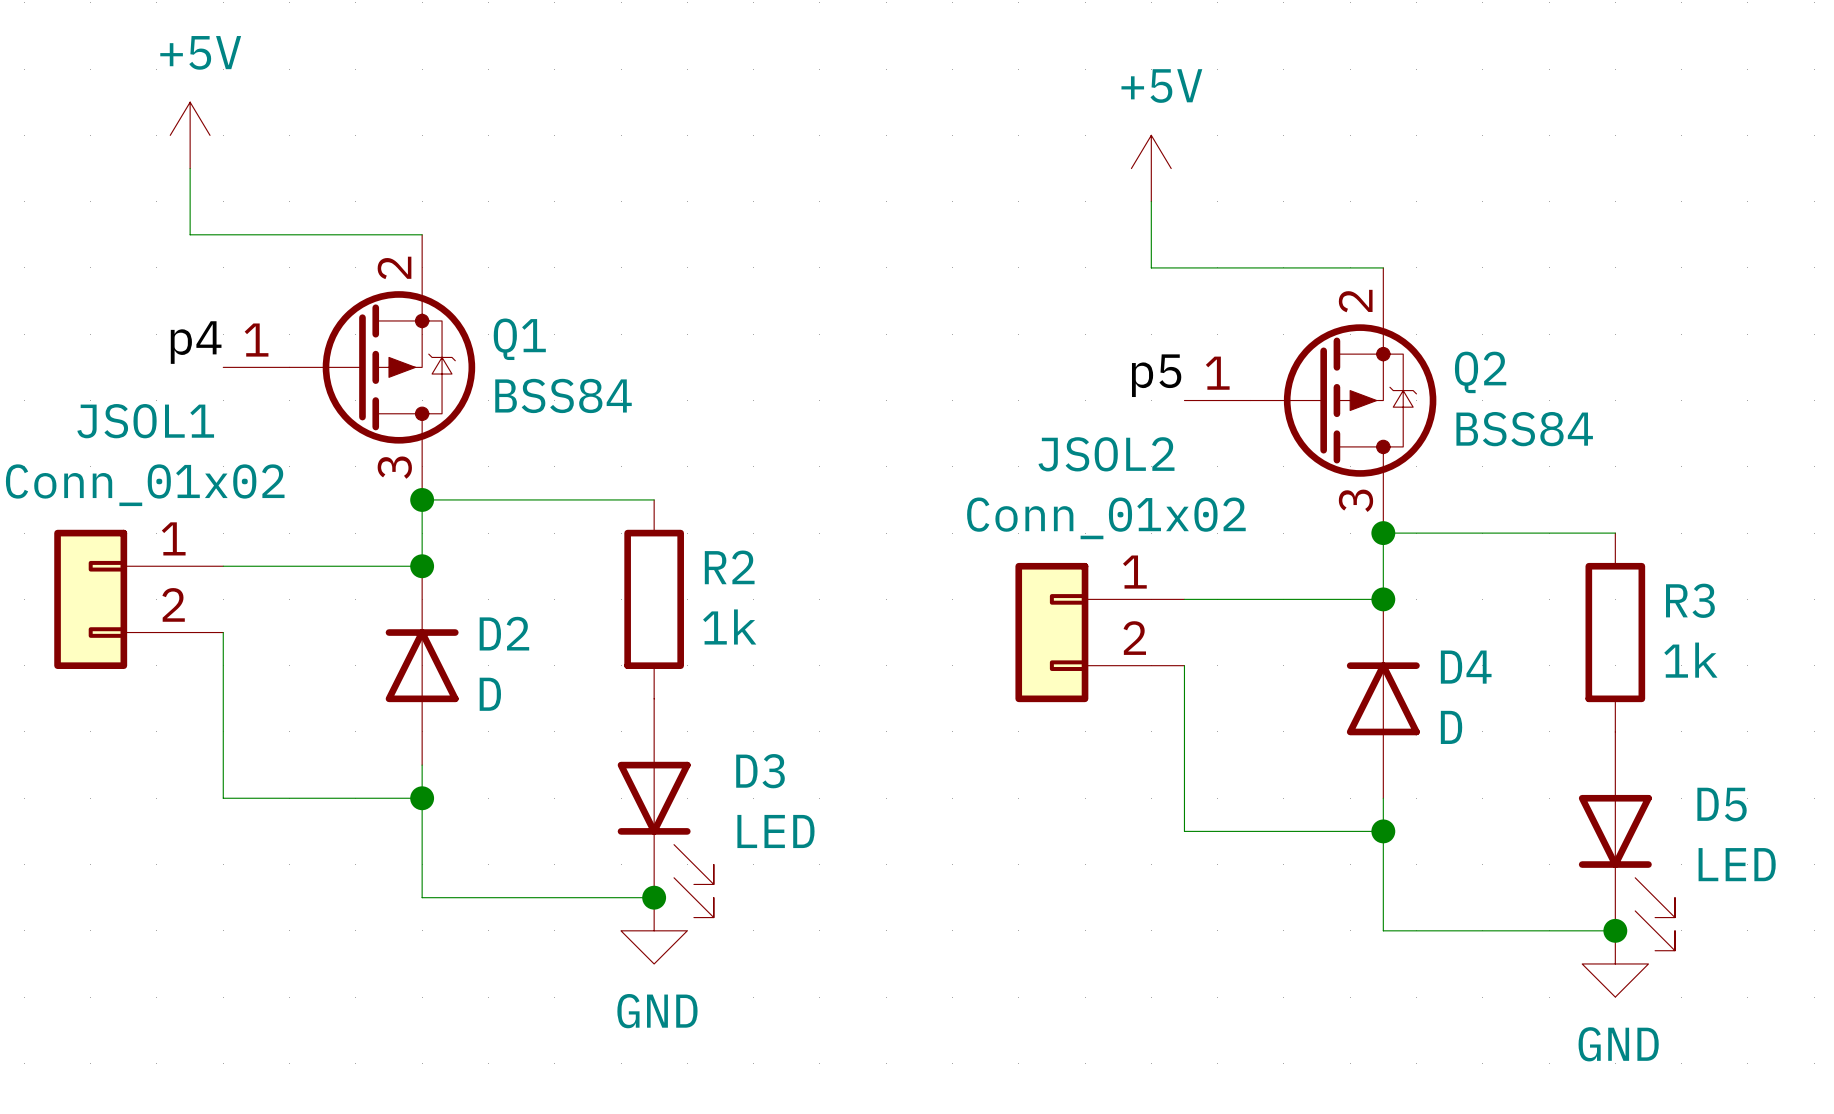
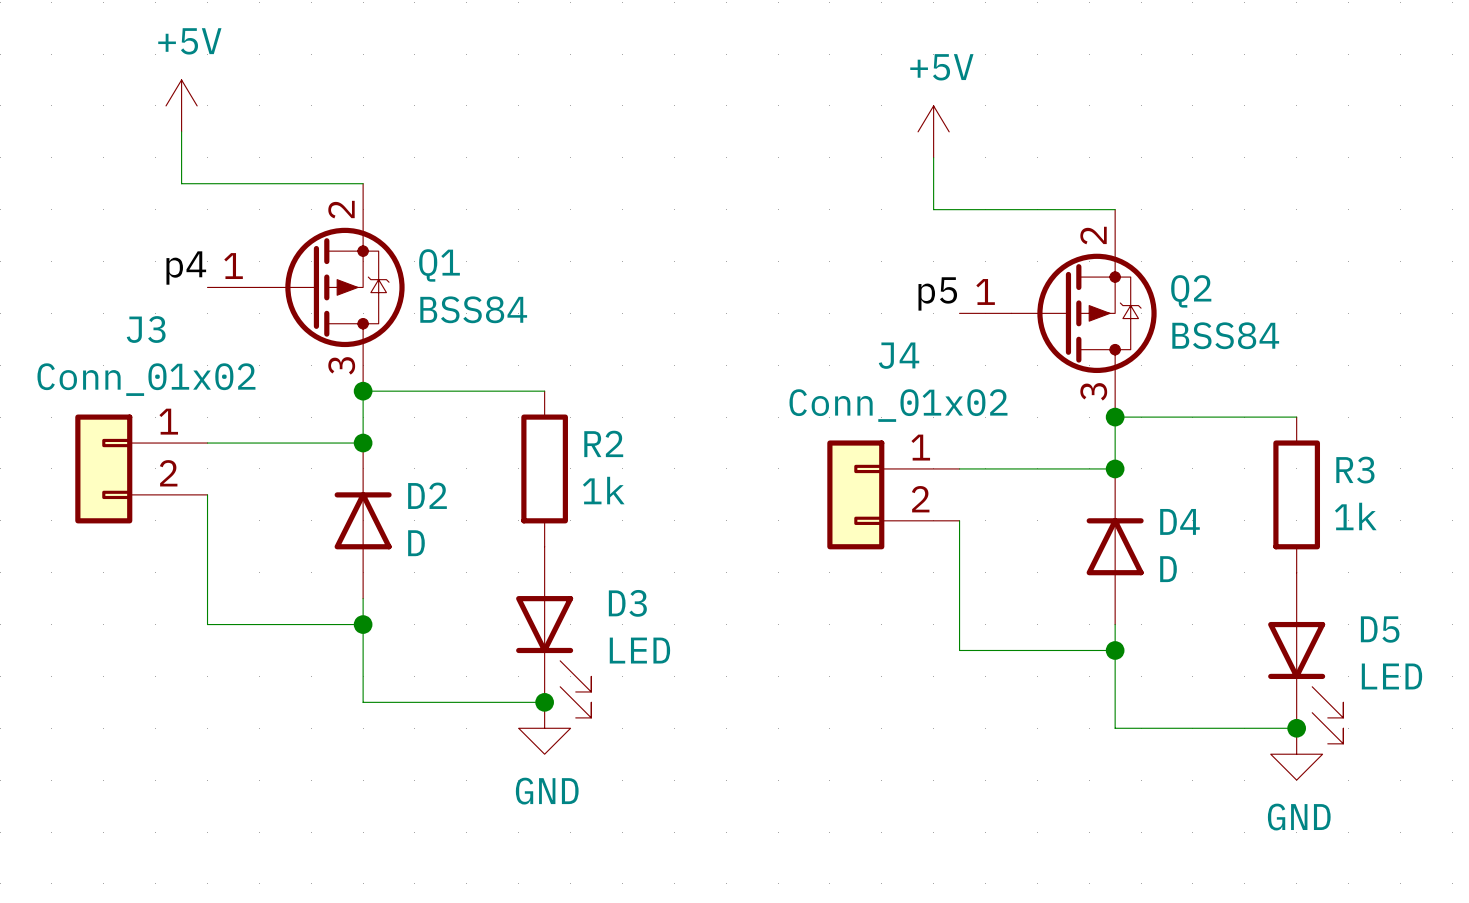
JSOL1 name: JSOL1 (145, 421) -> J3 (146, 329)
JSOL2 name: JSOL2 (1106, 454) -> J4 (899, 355)

